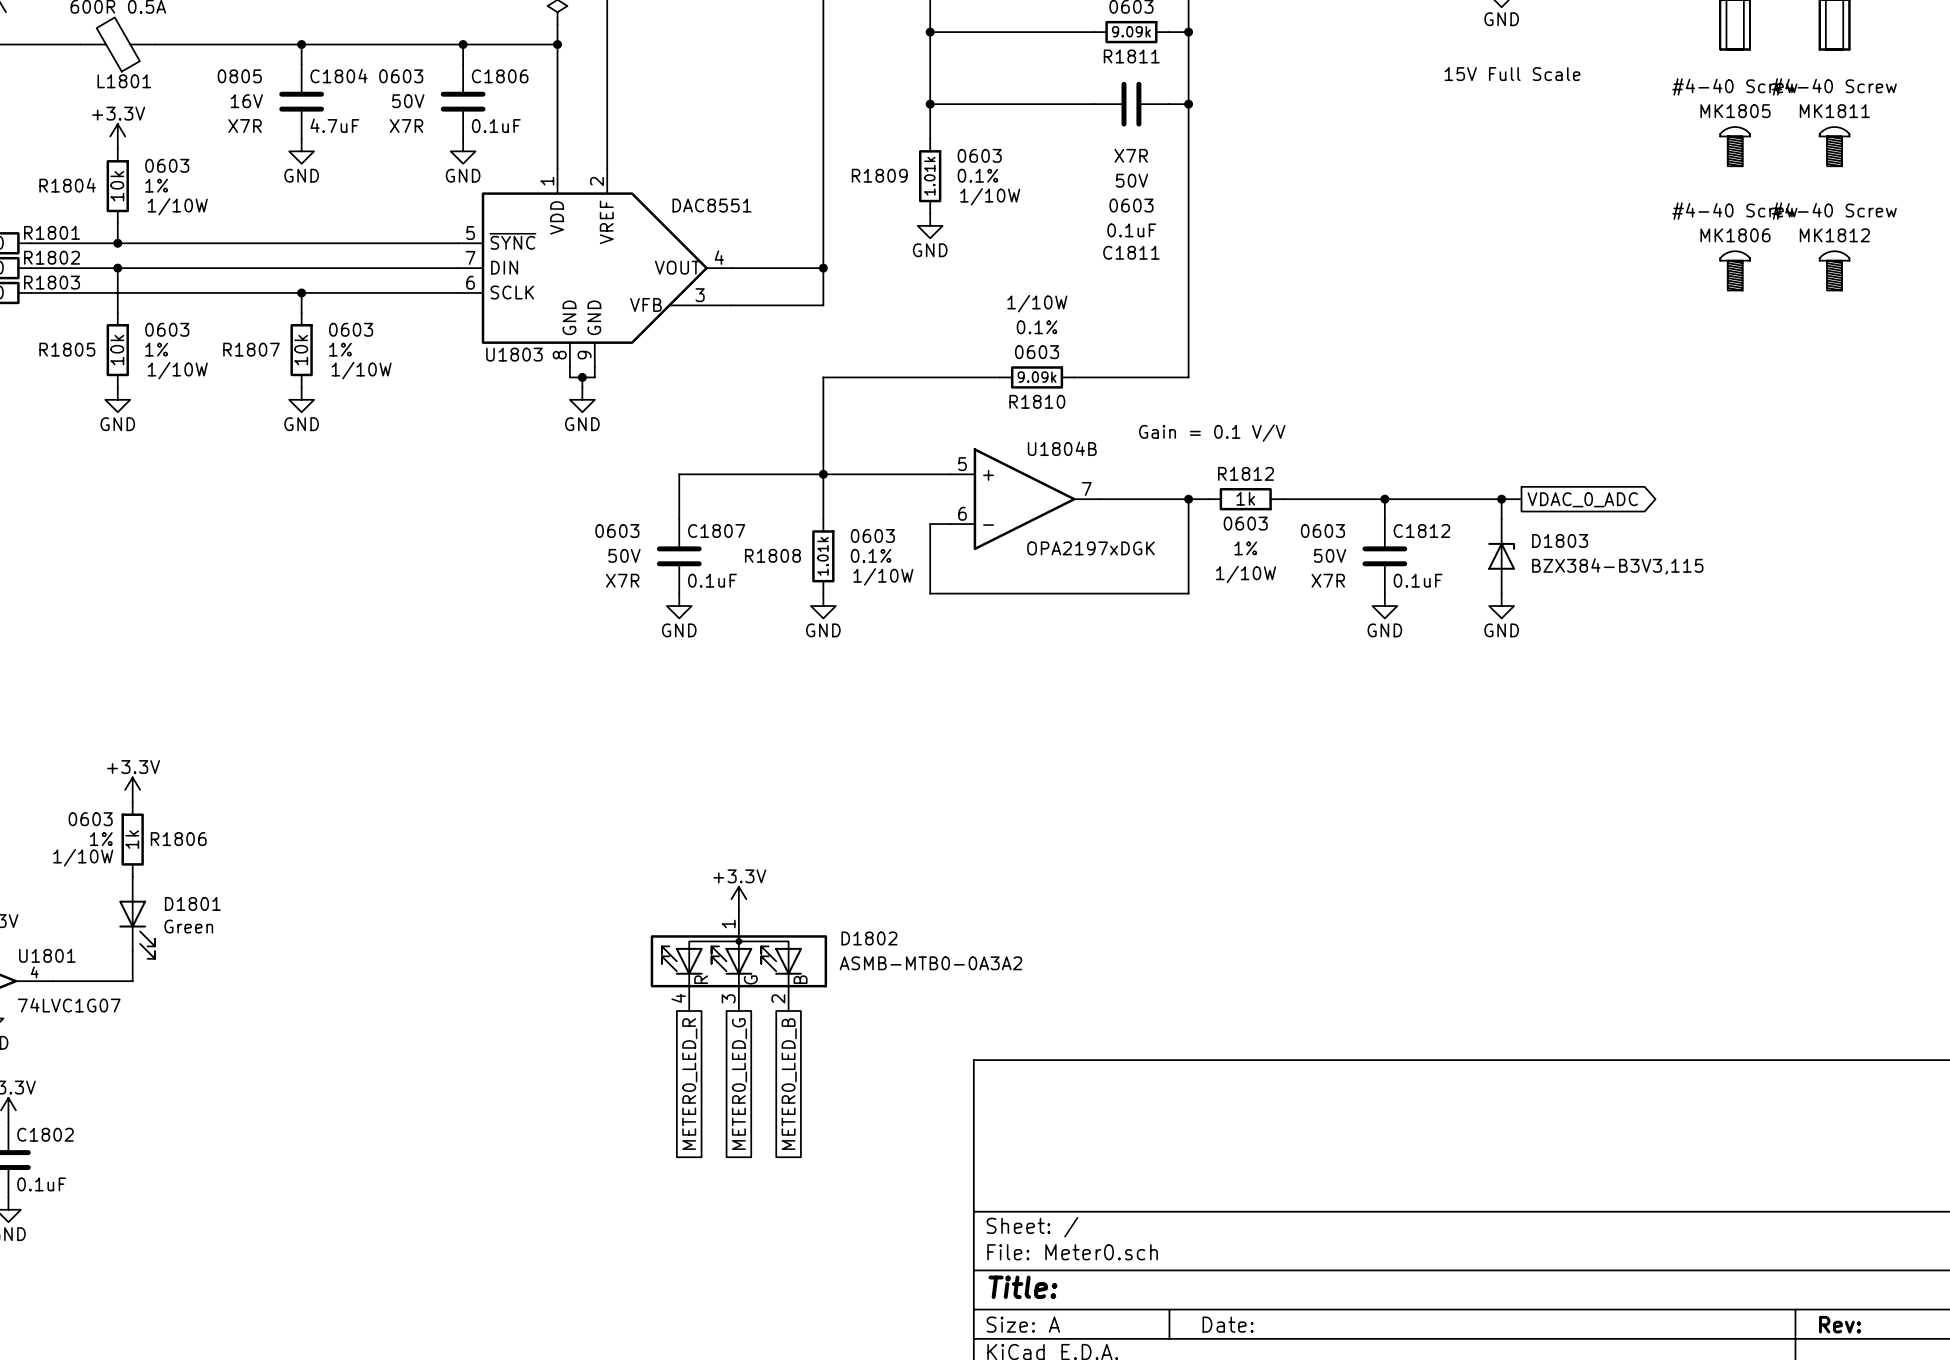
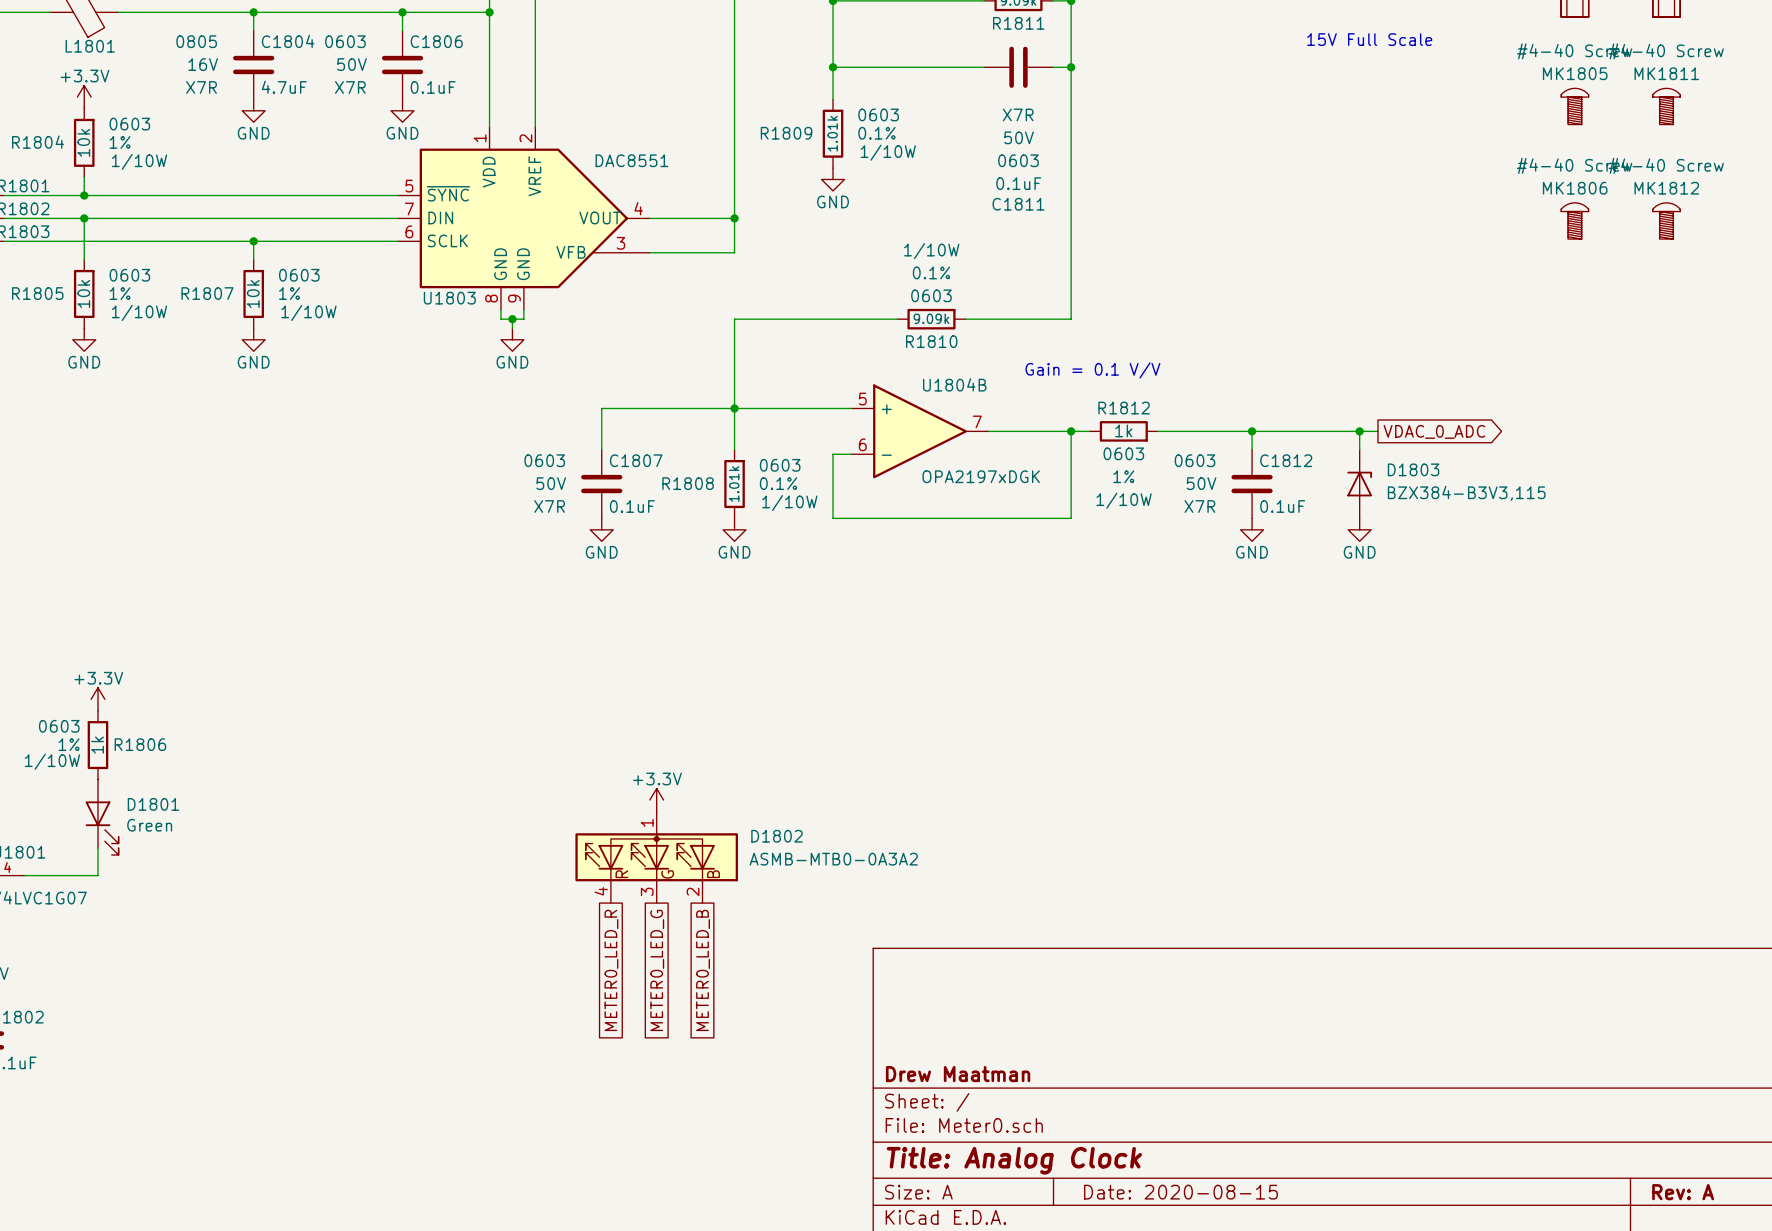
title block: none -> Drew Maatman (958, 1074)
title block: Title: (1023, 1287) -> Title: Analog Clock (1014, 1160)
title block: Date: (1228, 1324) -> Date: 2020-08-15 (1180, 1192)
title block: Rev: (1840, 1324) -> Rev: A (1683, 1192)

